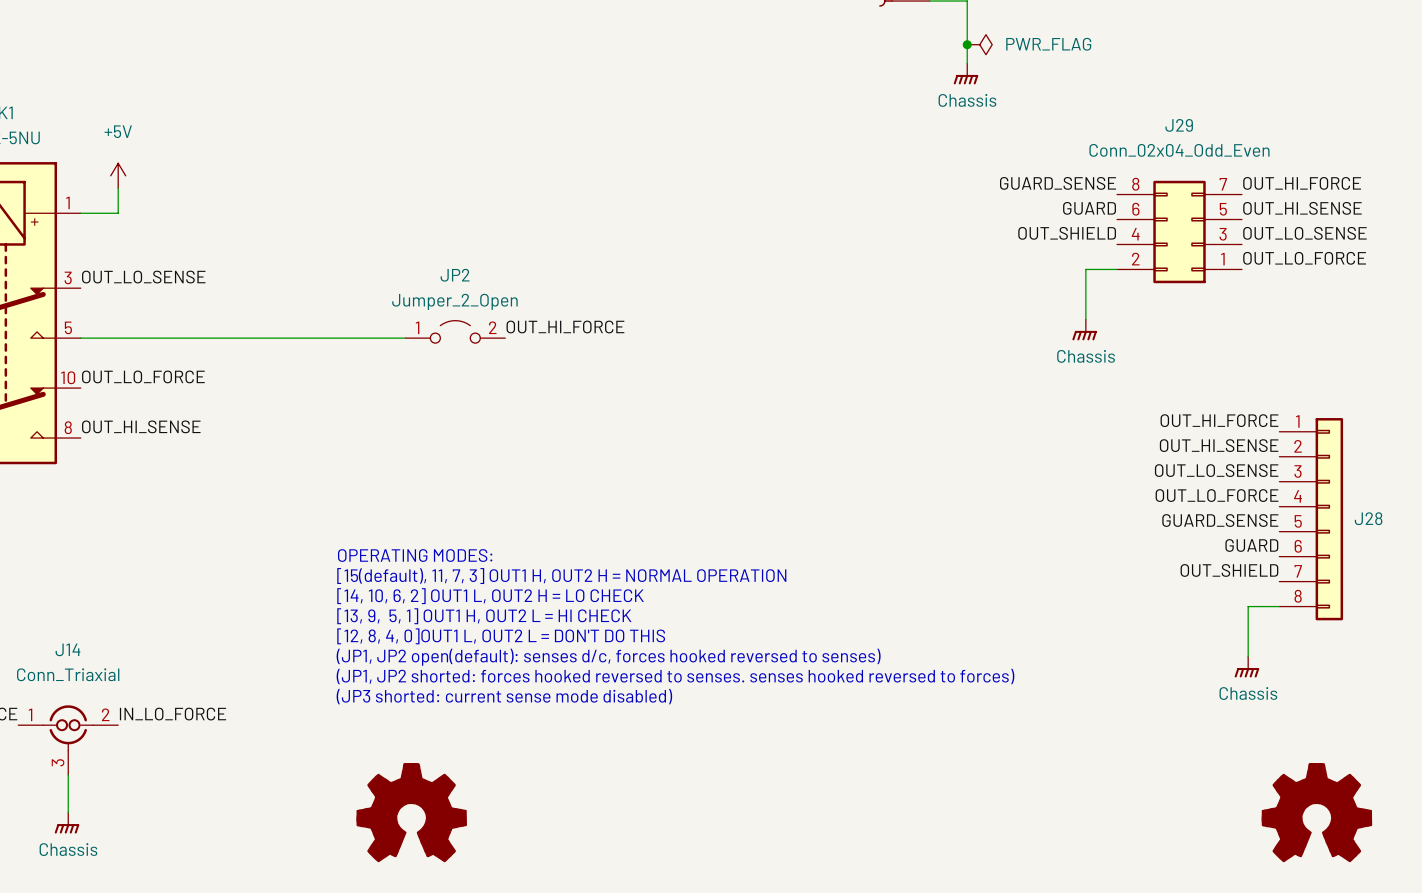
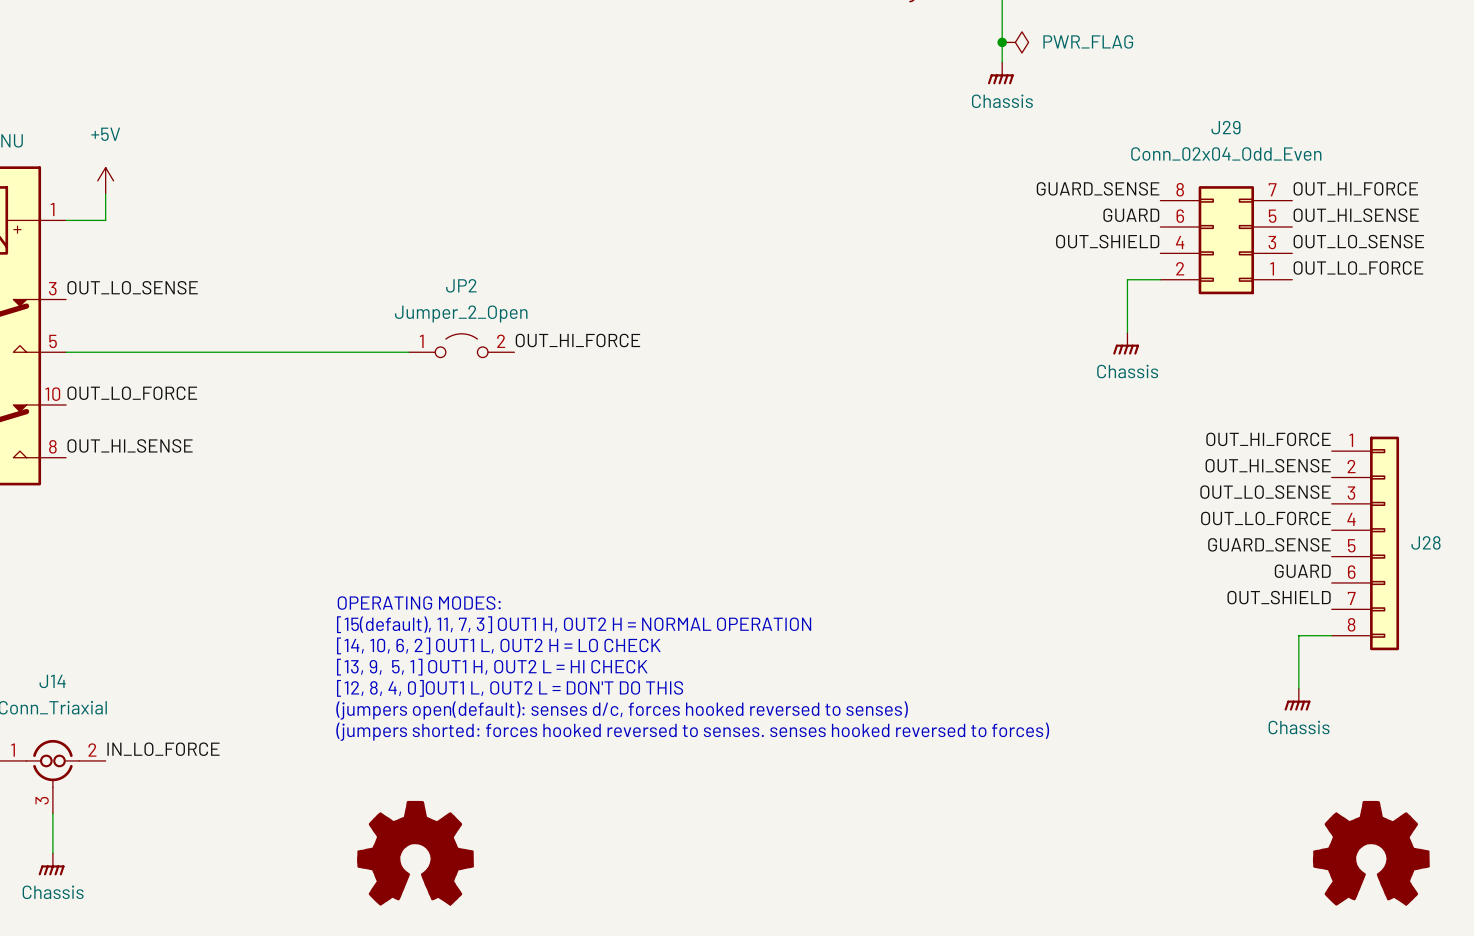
text: OPERATING MODES: (415, 555) -> none
text: [15(default), 11, 7, 3] OUT1 H, OUT2 H = NORMAL OPERATION (561, 576) -> OPERATING MODES: (419, 603)
text: [14, 10, 6, 2] OUT1 L, OUT2 H = LO CHECK (490, 596) -> [15(default), 11, 7, 3] OUT1 H, OUT2 H = NORMAL OPERATION (574, 624)
text: [13, 9, 5, 1] OUT1 H, OUT2 L = HI CHECK (484, 616) -> [14, 10, 6, 2] OUT1 L, OUT2 H = LO CHECK (498, 645)
text: [12, 8, 4, 0]OUT1 L, OUT2 L = DON'T DO THIS (501, 636) -> [13, 9, 5, 1] OUT1 H, OUT2 L = HI CHECK (492, 667)
text: (JP1, JP2 open(default): senses d/c, forces hooked reversed to senses) (608, 657) -> [12, 8, 4, 0]OUT1 L, OUT2 L = DON'T DO THIS (510, 688)
text: (JP1, JP2 shorted: forces hooked reversed to senses. senses hooked reversed to forces) (675, 676) -> (jumpers open(default): senses d/c, forces hooked reversed to senses) (622, 710)
text: (JP3 shorted: current sense mode disabled) (504, 696) -> (jumpers shorted: forces hooked reversed to senses. senses hooked reversed to forces) (692, 731)

